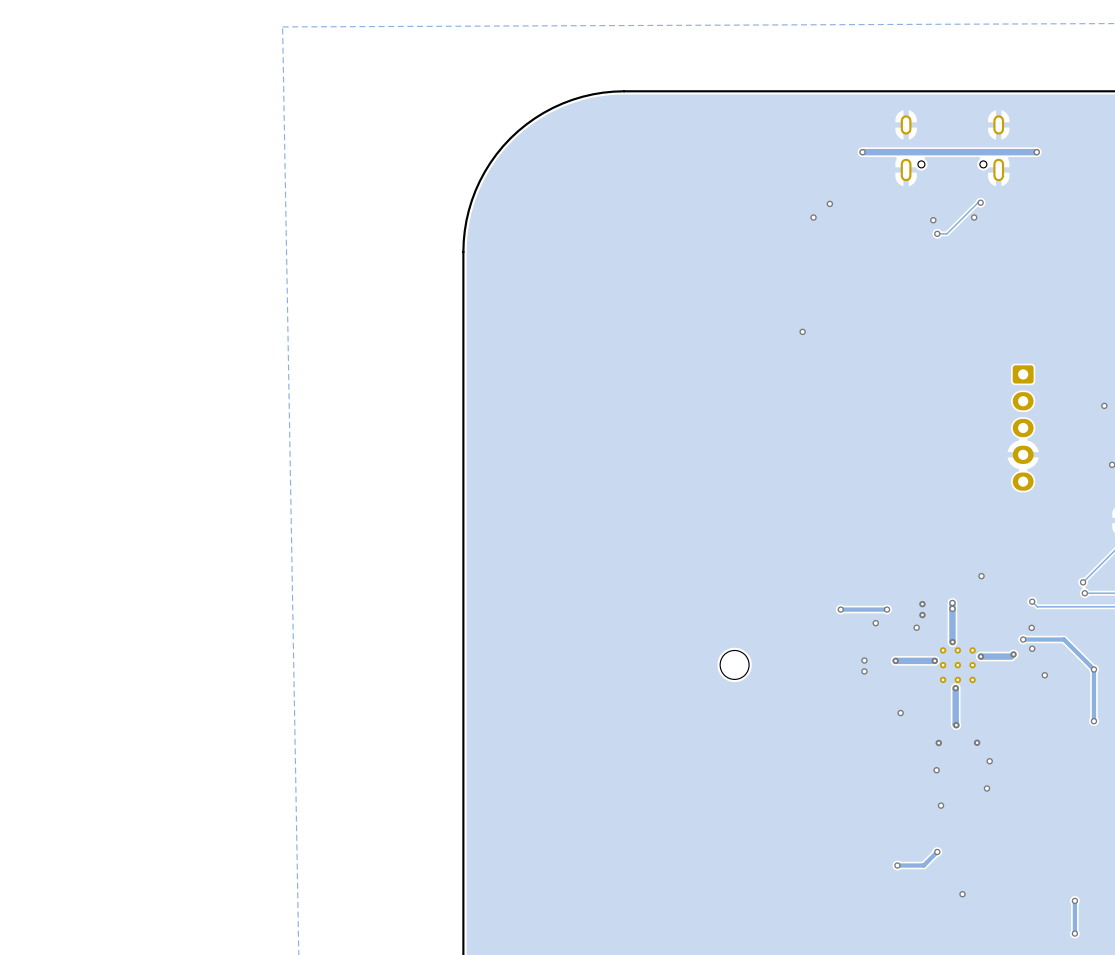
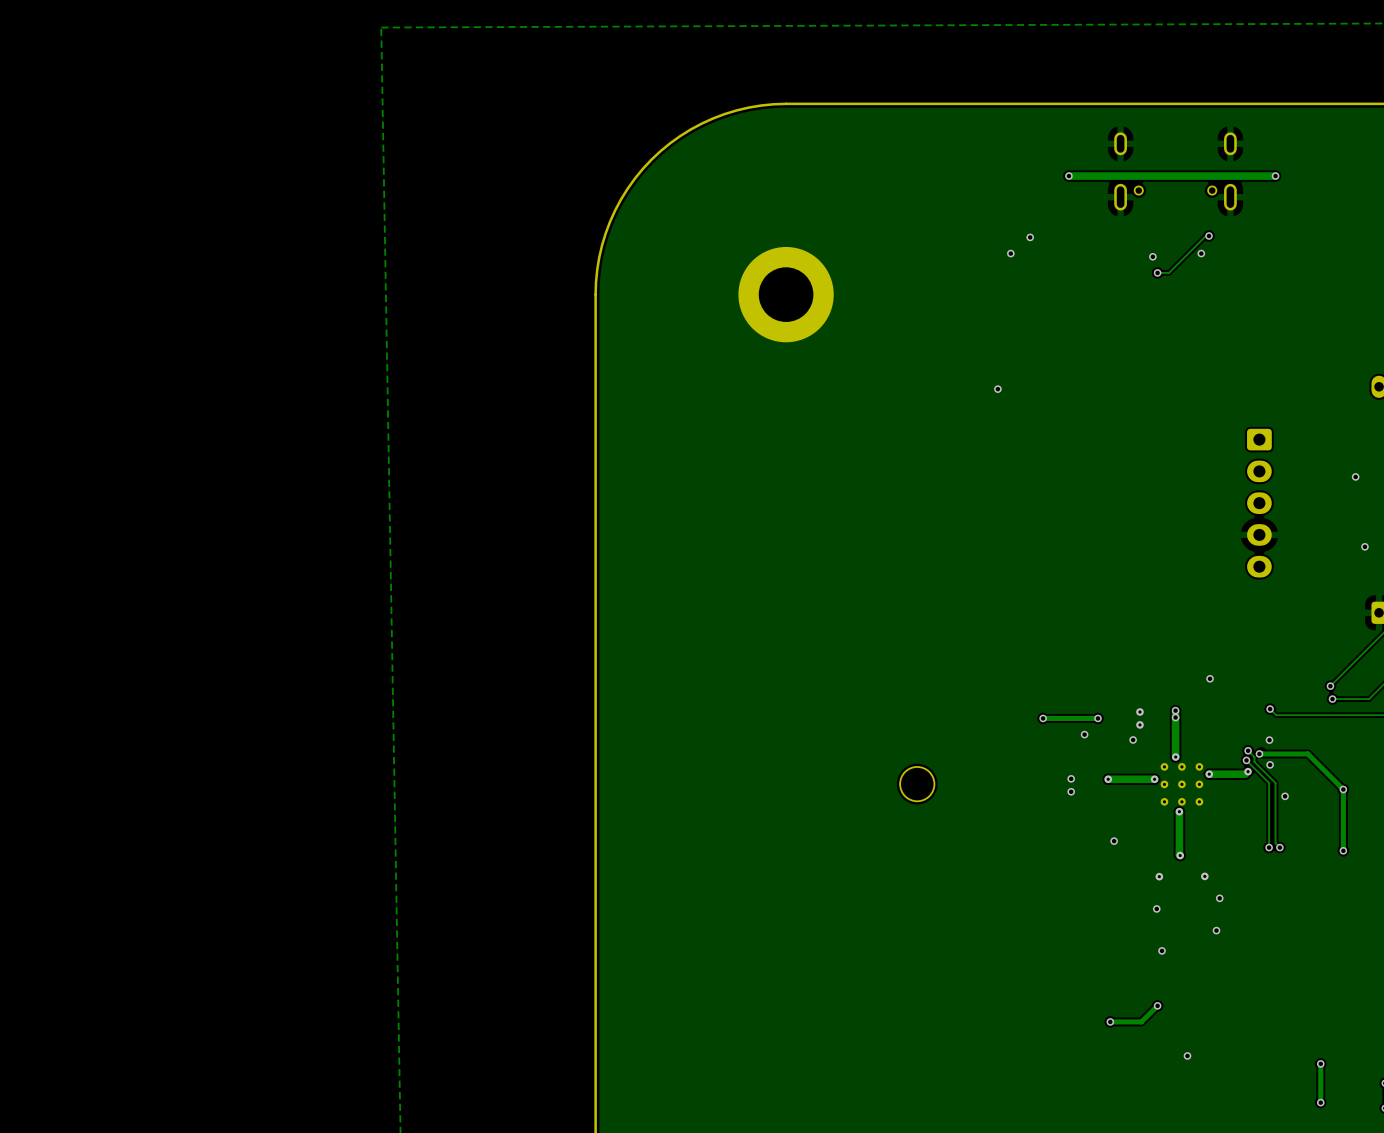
part: none -> (786, 294)
track: none -> (1248, 750) (1254, 757) (1254, 761) (1275, 783) (1275, 843) (1279, 847)
via: none -> (1248, 750)
track: none -> (1246, 760) (1269, 783) (1269, 847)
via: none -> (1246, 760)
via: none -> (1269, 847)
via: none -> (1279, 847)

